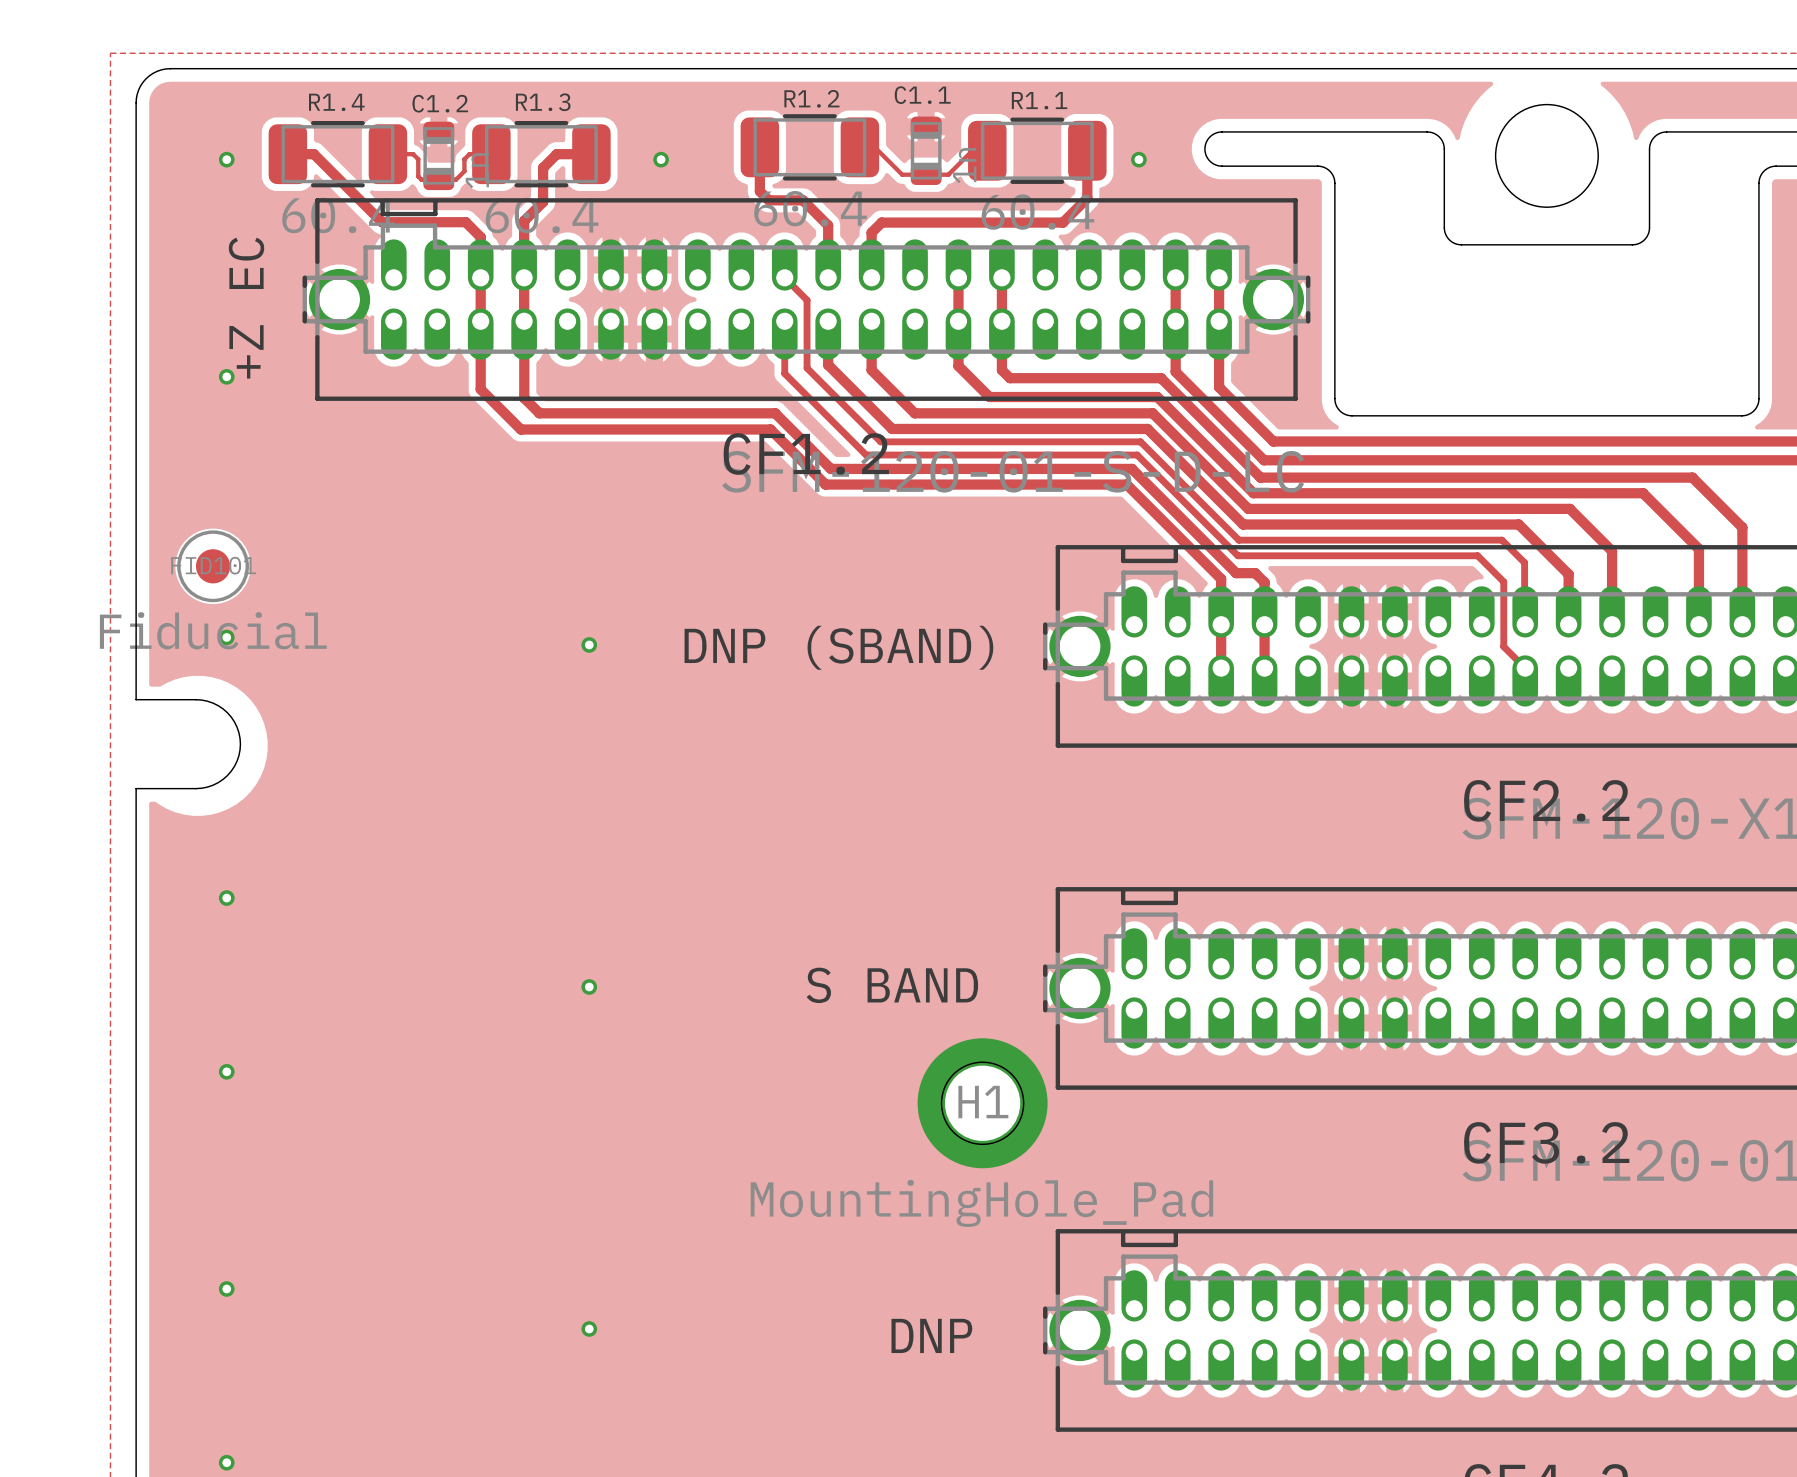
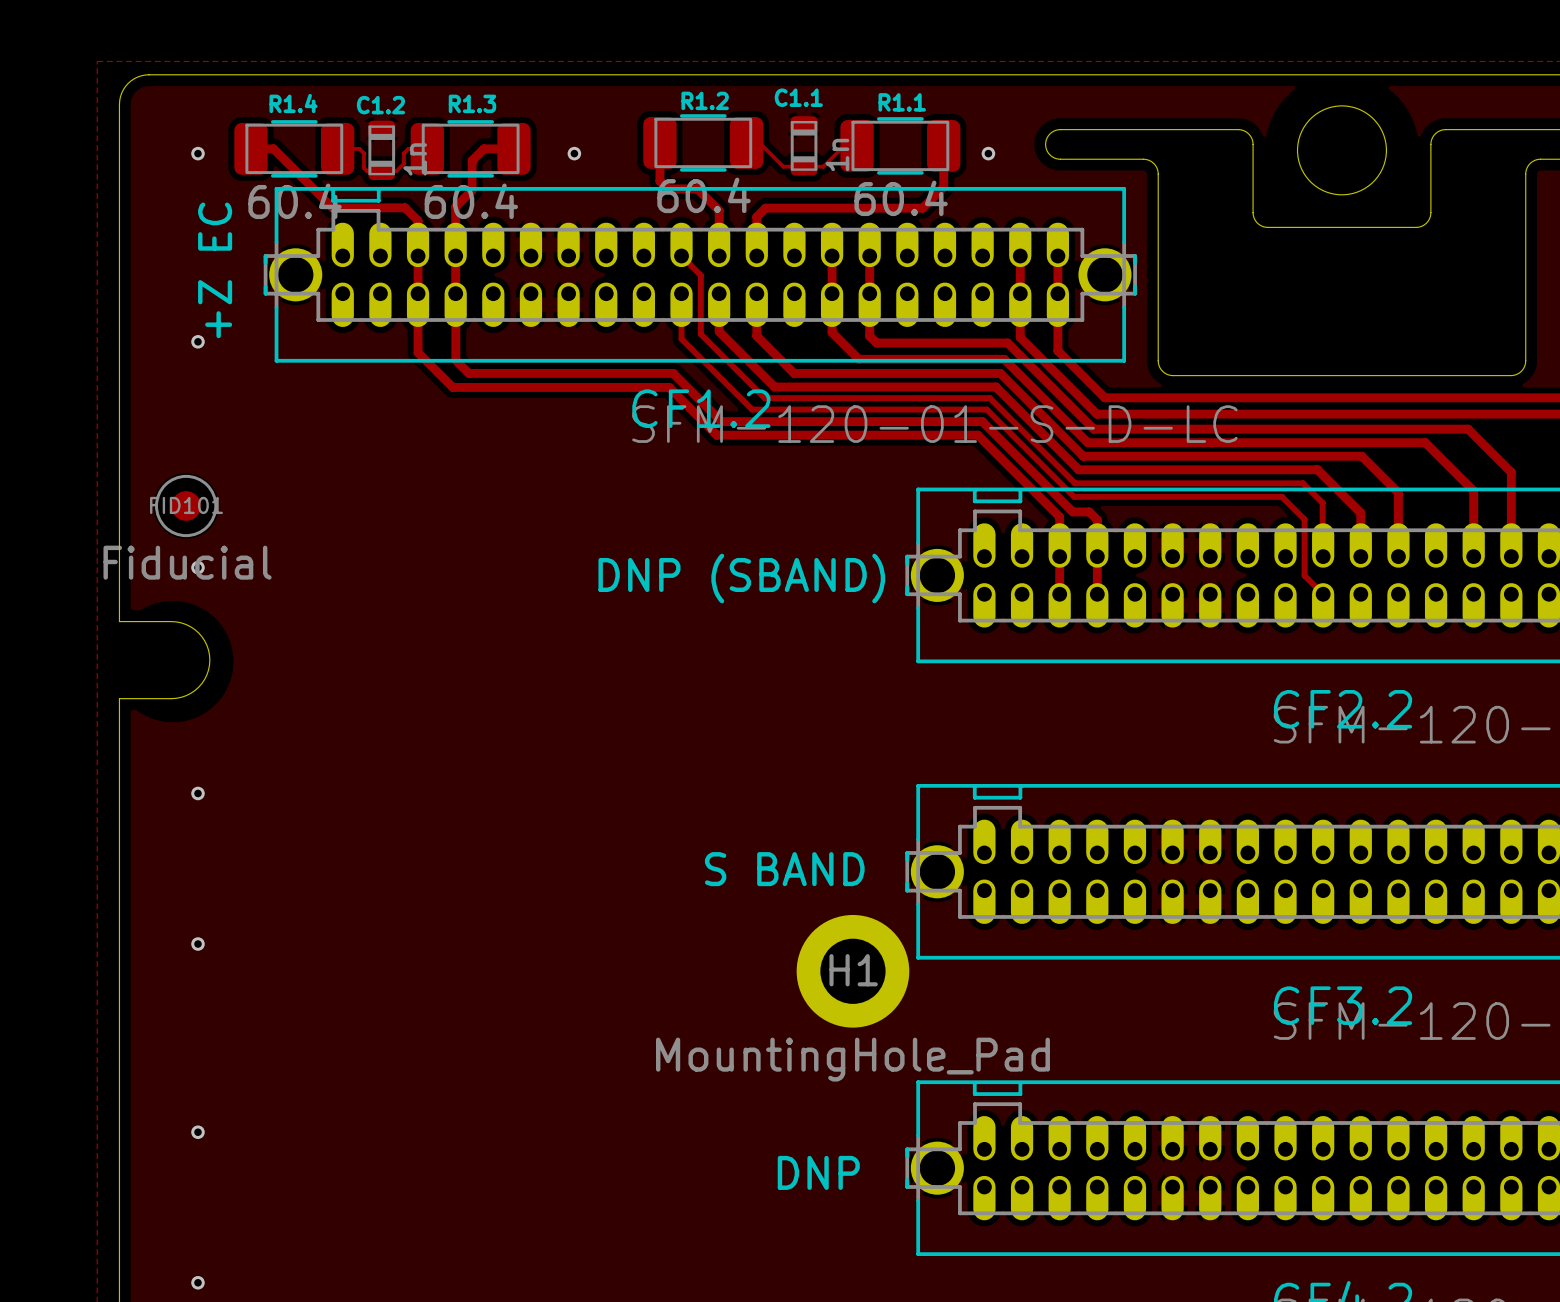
via: (589, 644) -> none
via: (589, 986) -> none
via: (589, 1329) -> none

